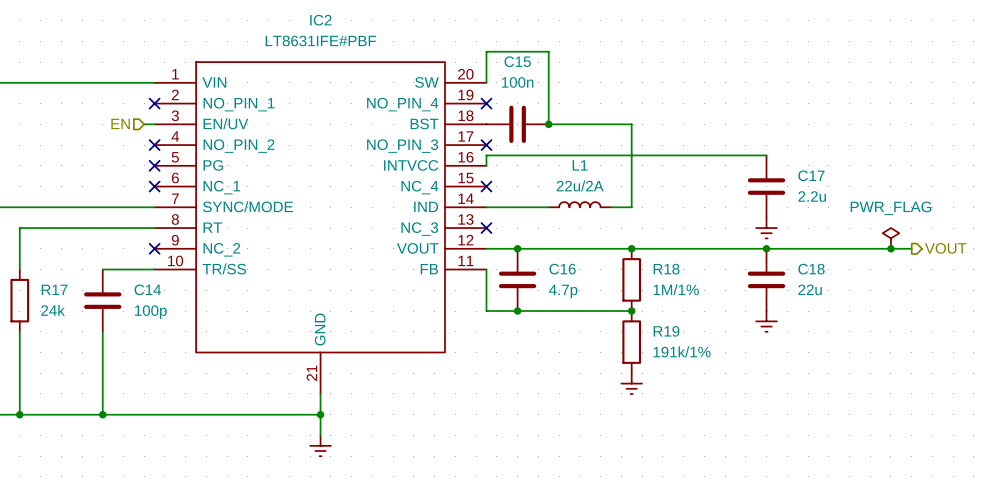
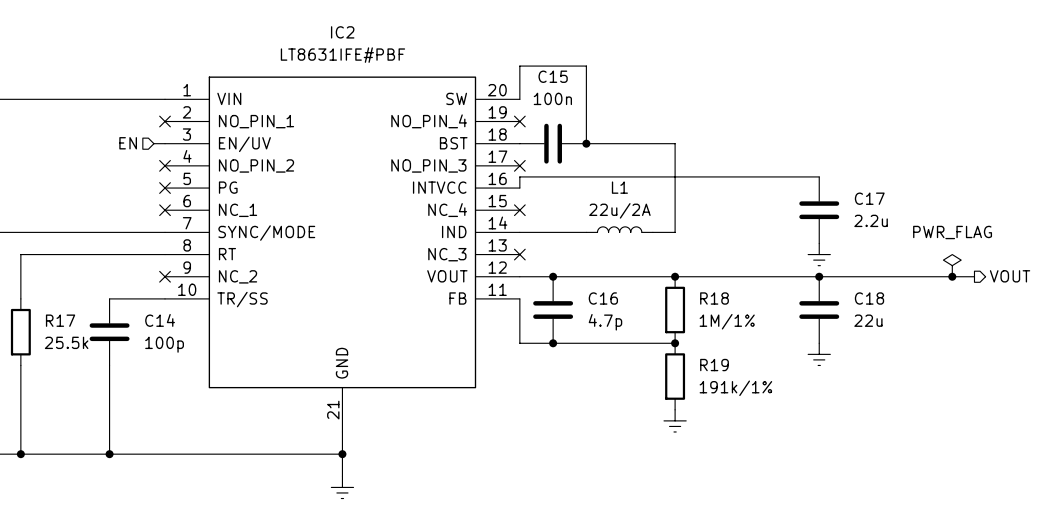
R17 value: 24k (53, 310) -> 25.5k (66, 342)

